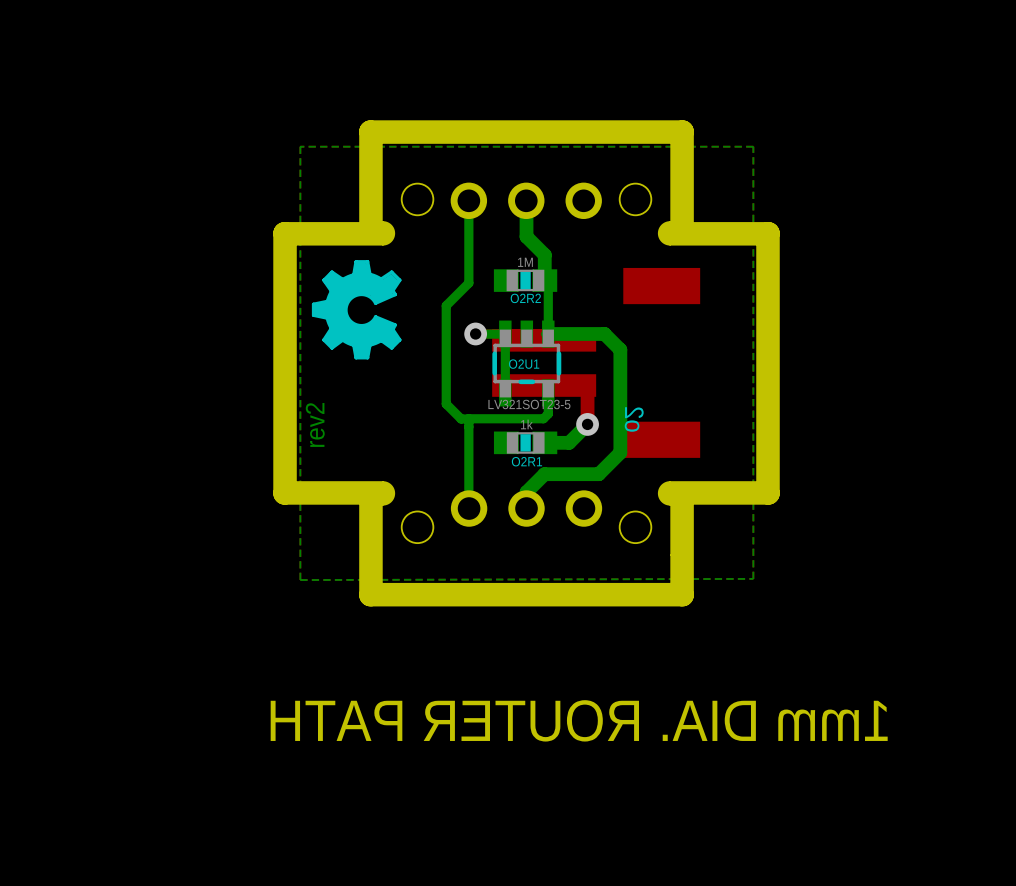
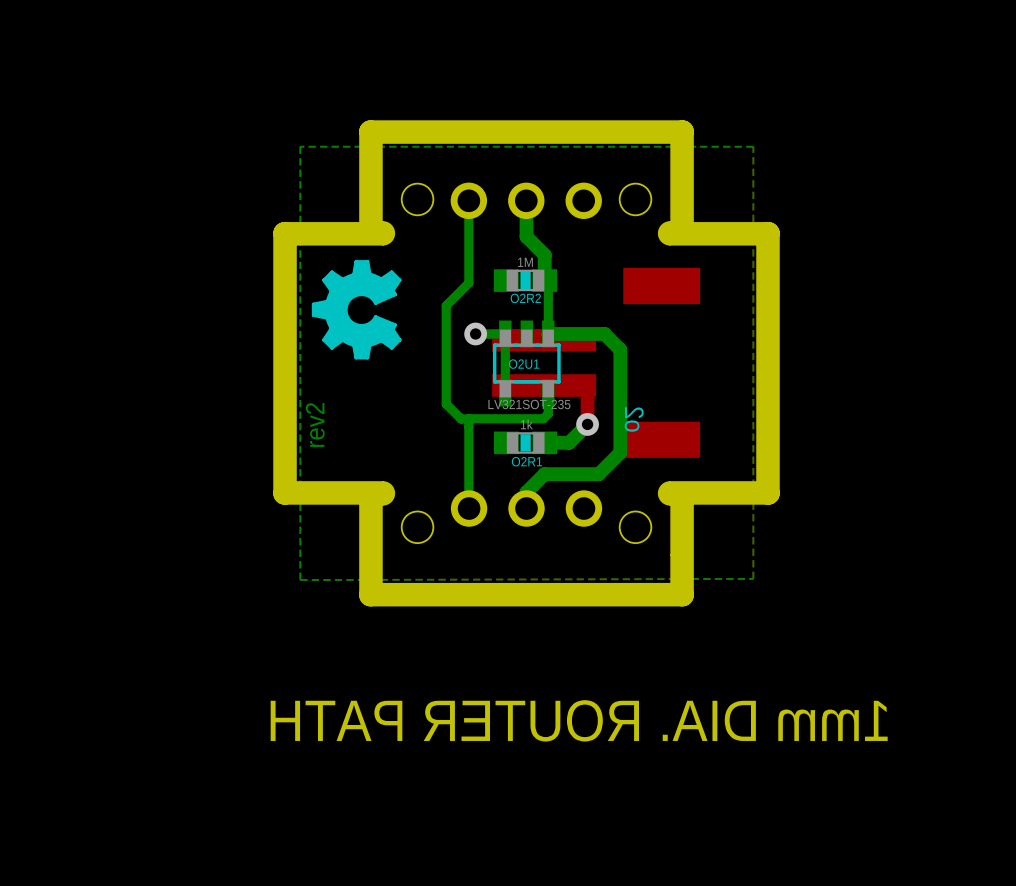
O2U1 footprint: [492, 320, 562, 407] -> [492, 320, 561, 407]
O2U1 value: LV321SOT23-5 (529, 404) -> LV321SOT-235 (529, 404)

